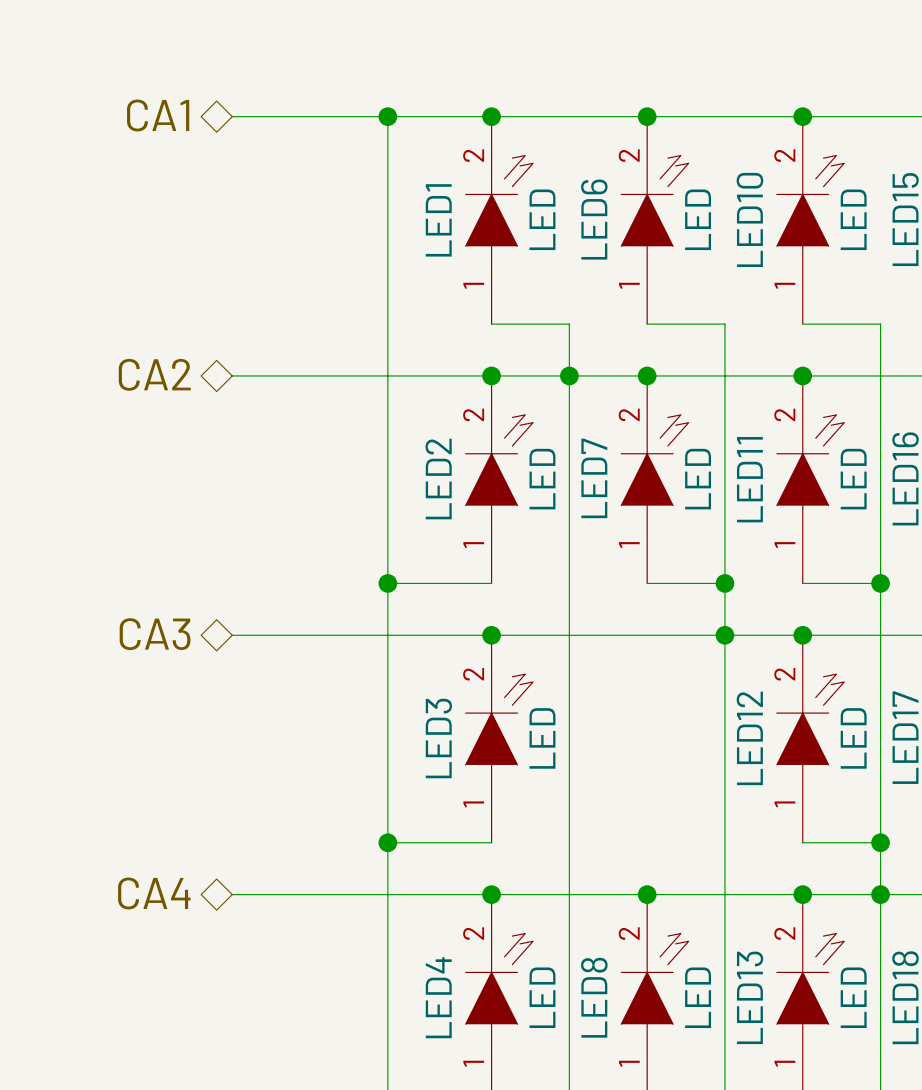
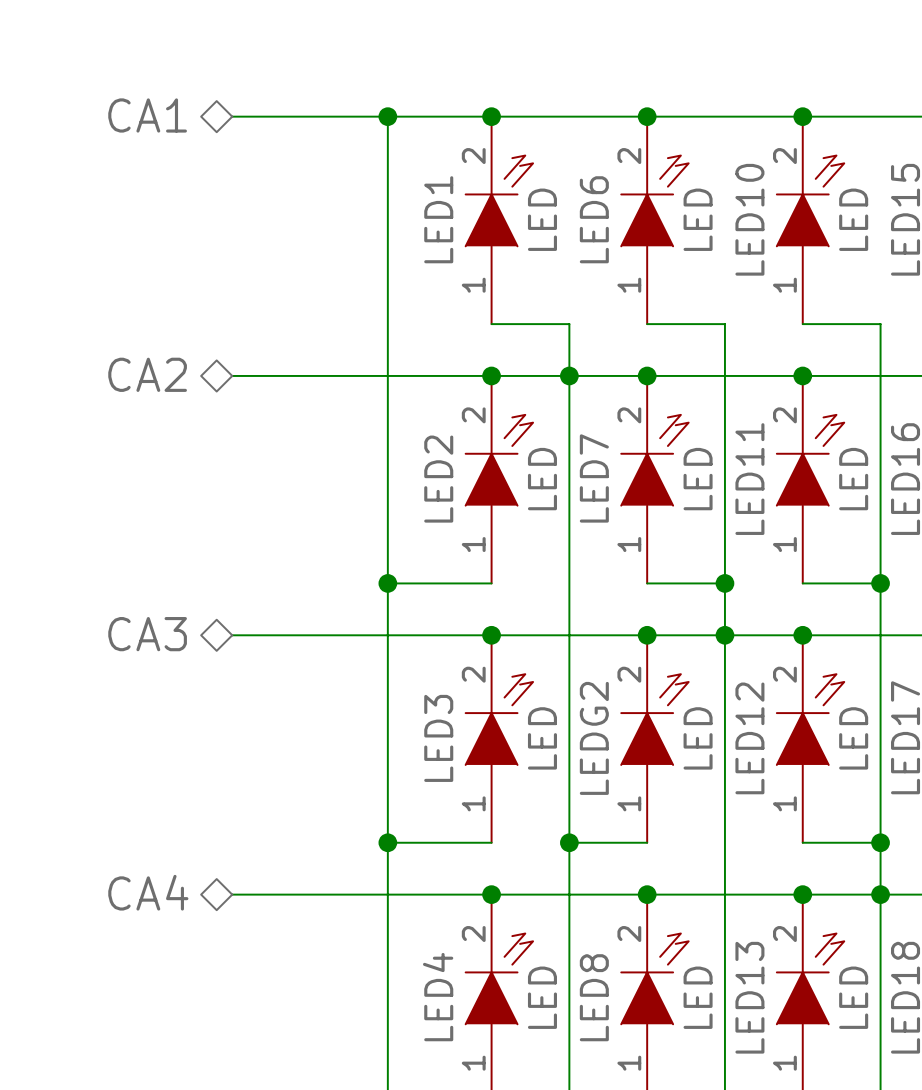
junction: none -> (647, 635)
LEDG2: none -> LED (654, 739)
wire: none -> (569, 842) (647, 842)
junction: none -> (569, 842)

